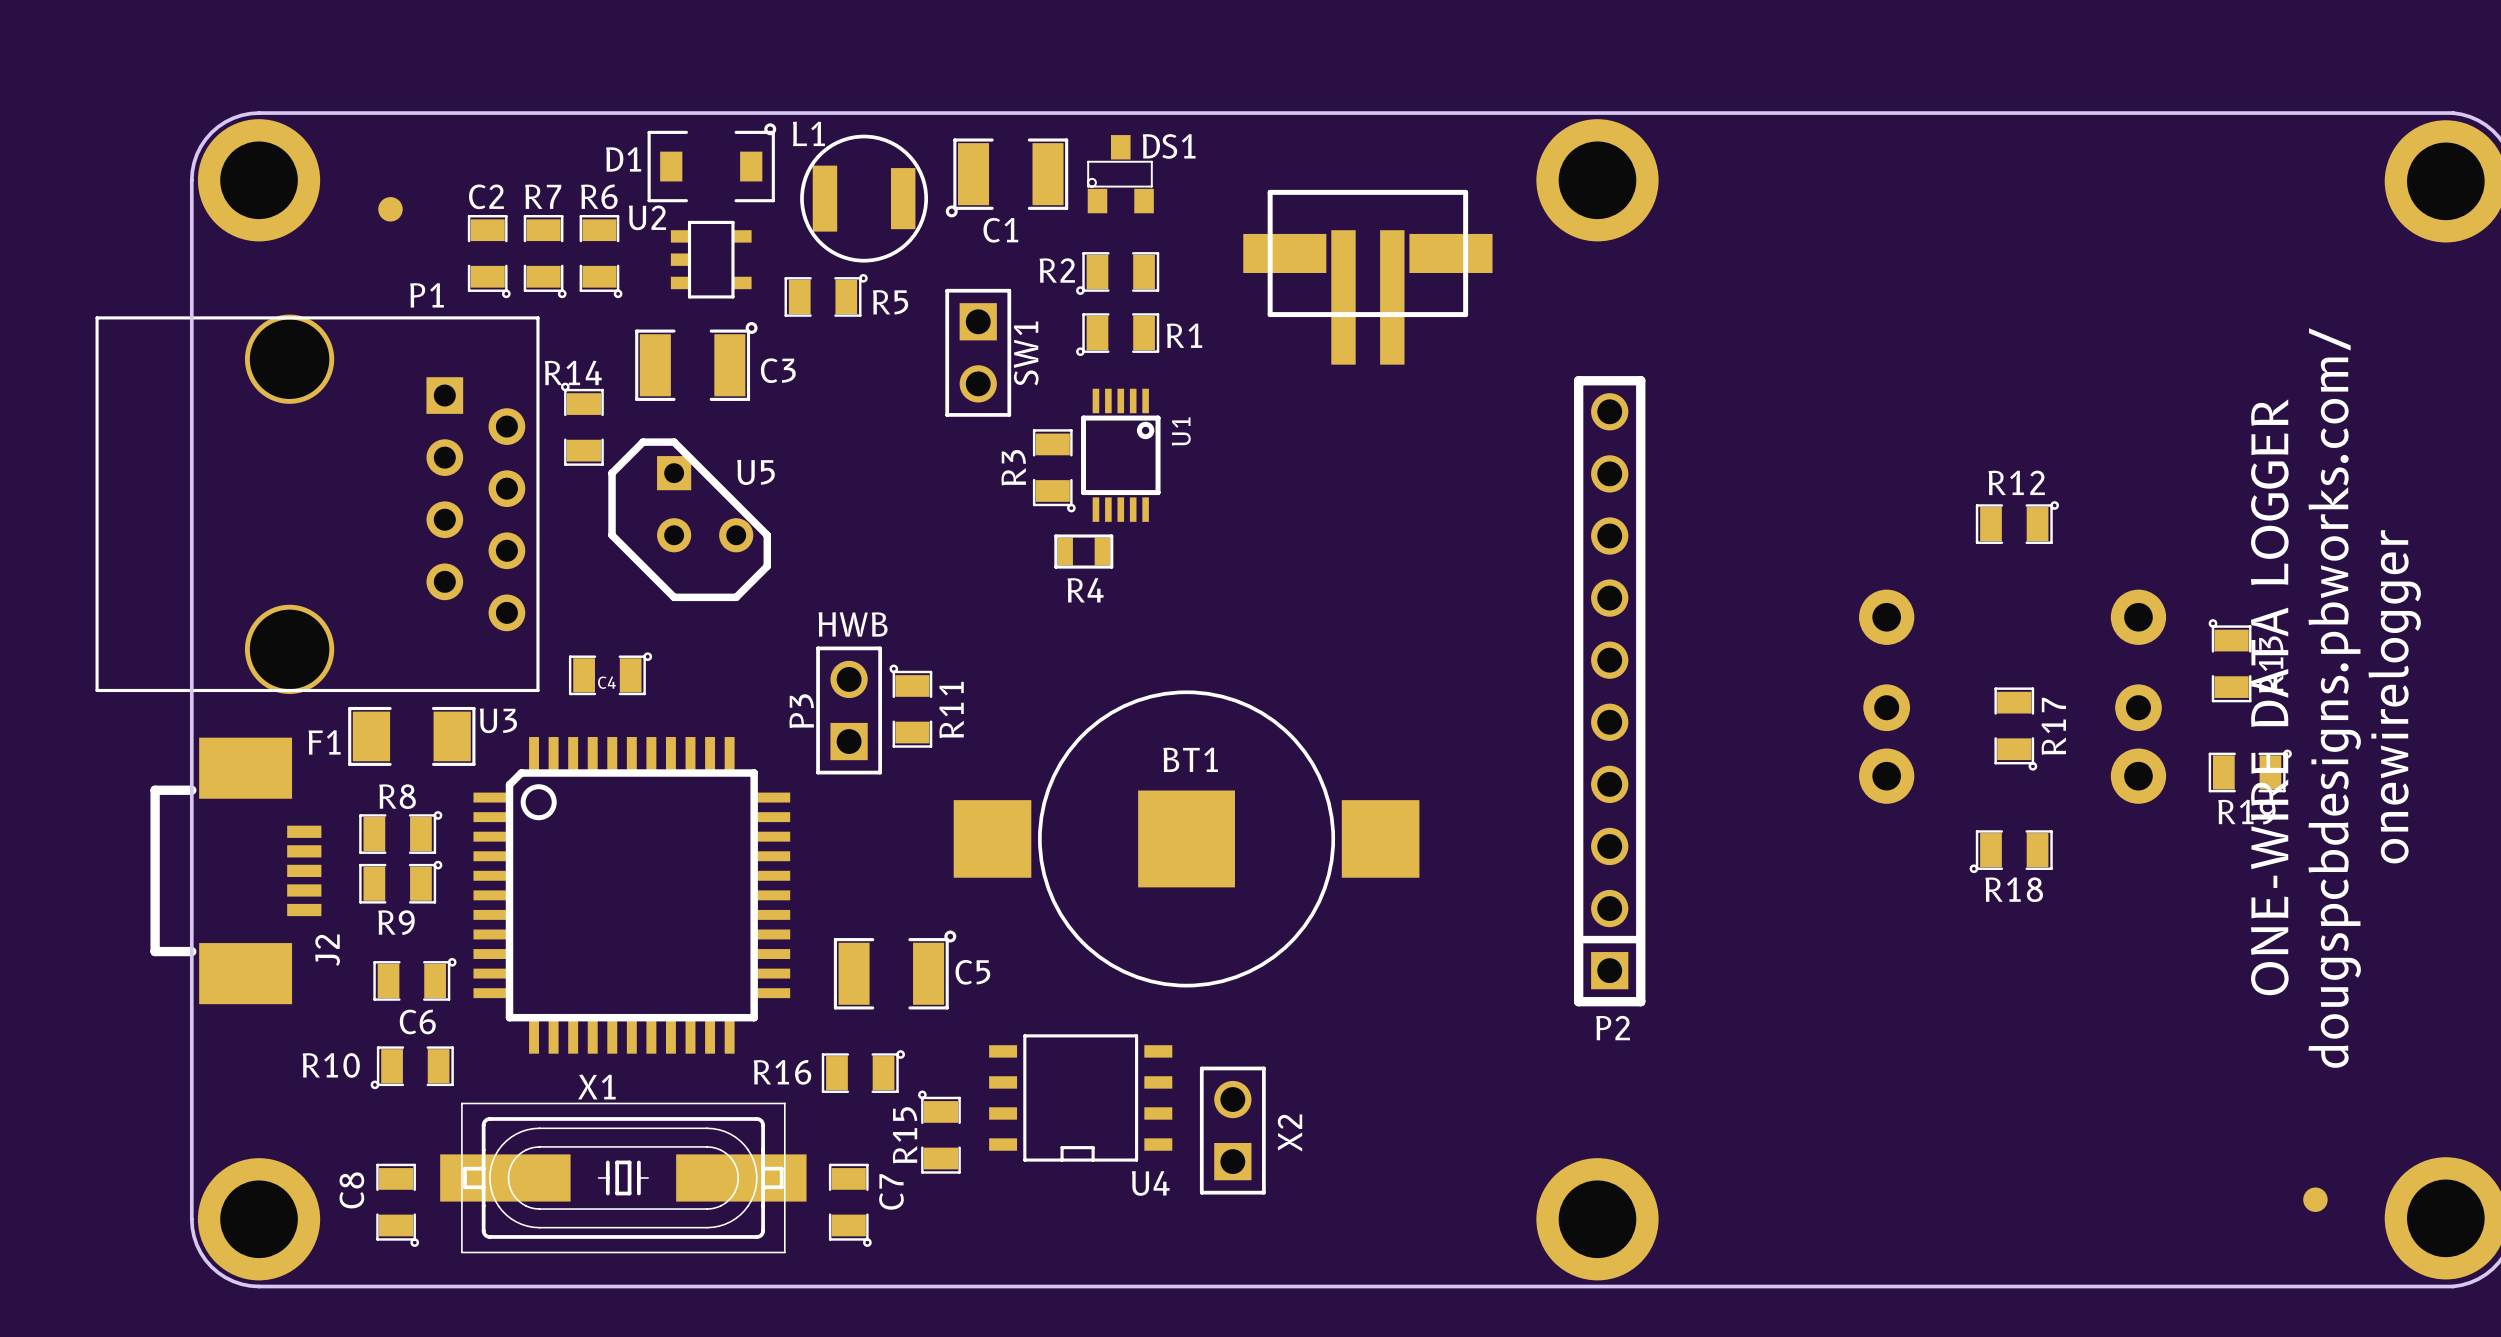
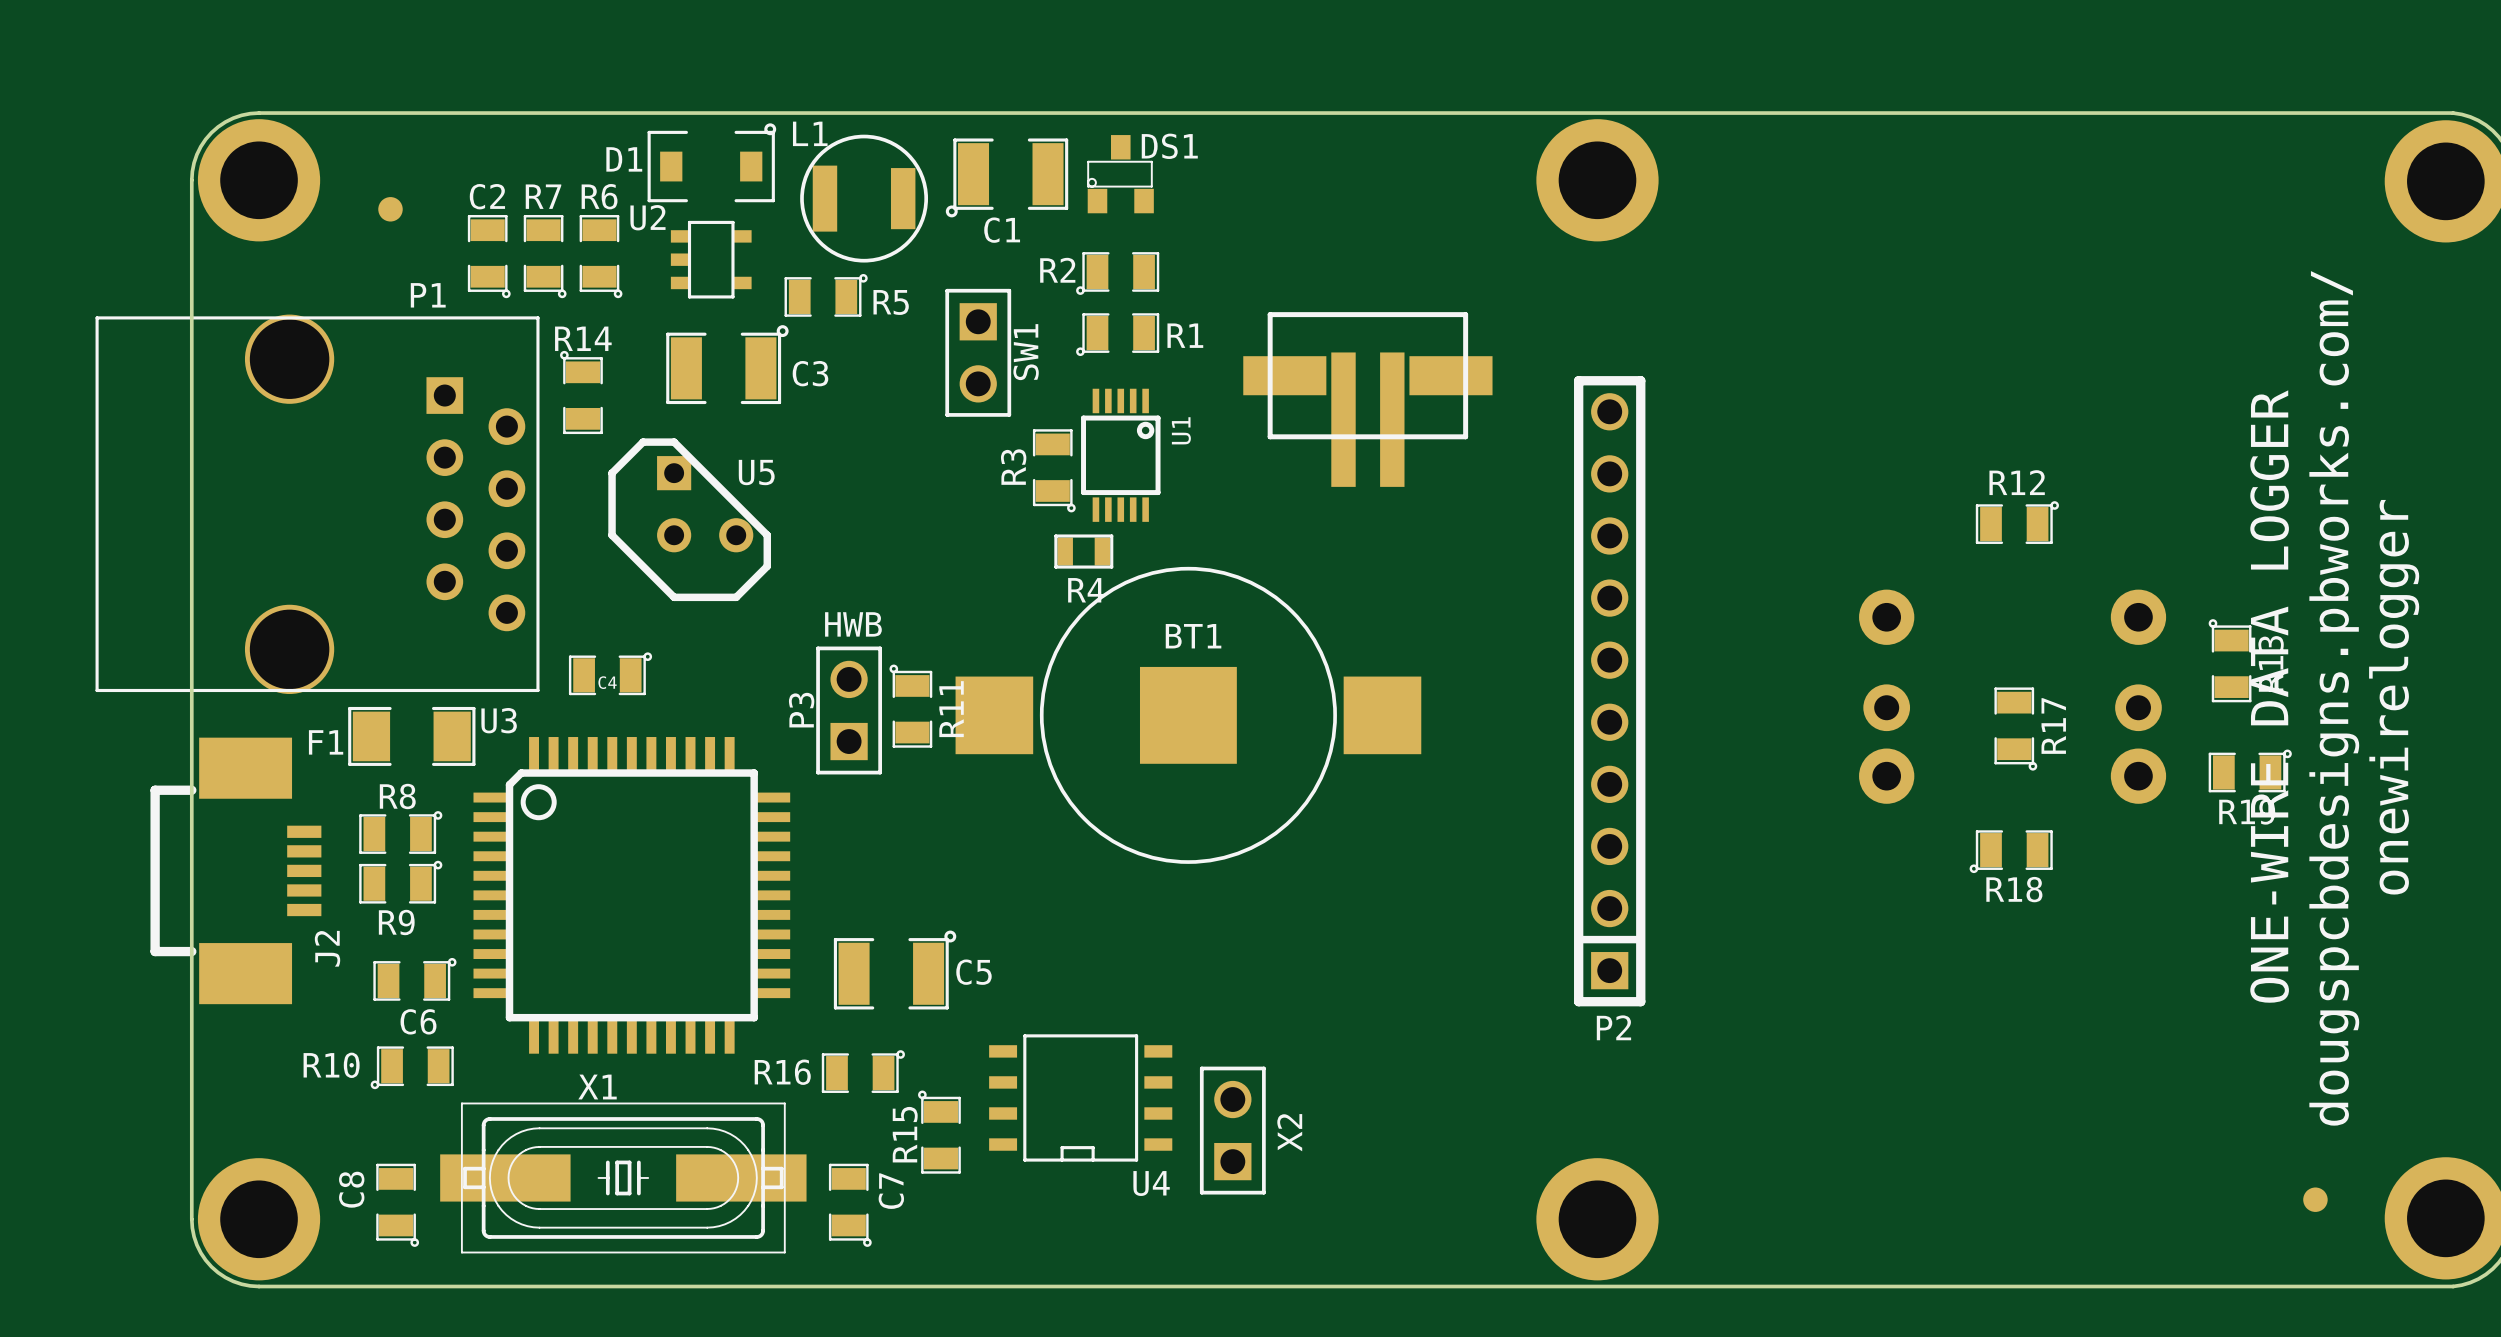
part position: (1367, 277) -> (1367, 399)
C3 position: (696, 361) -> (727, 364)
R14 name position: R14 (573, 372) -> R14 (583, 338)
R14 position: (582, 424) -> (581, 392)
BT1 position: (1186, 838) -> (1188, 715)

